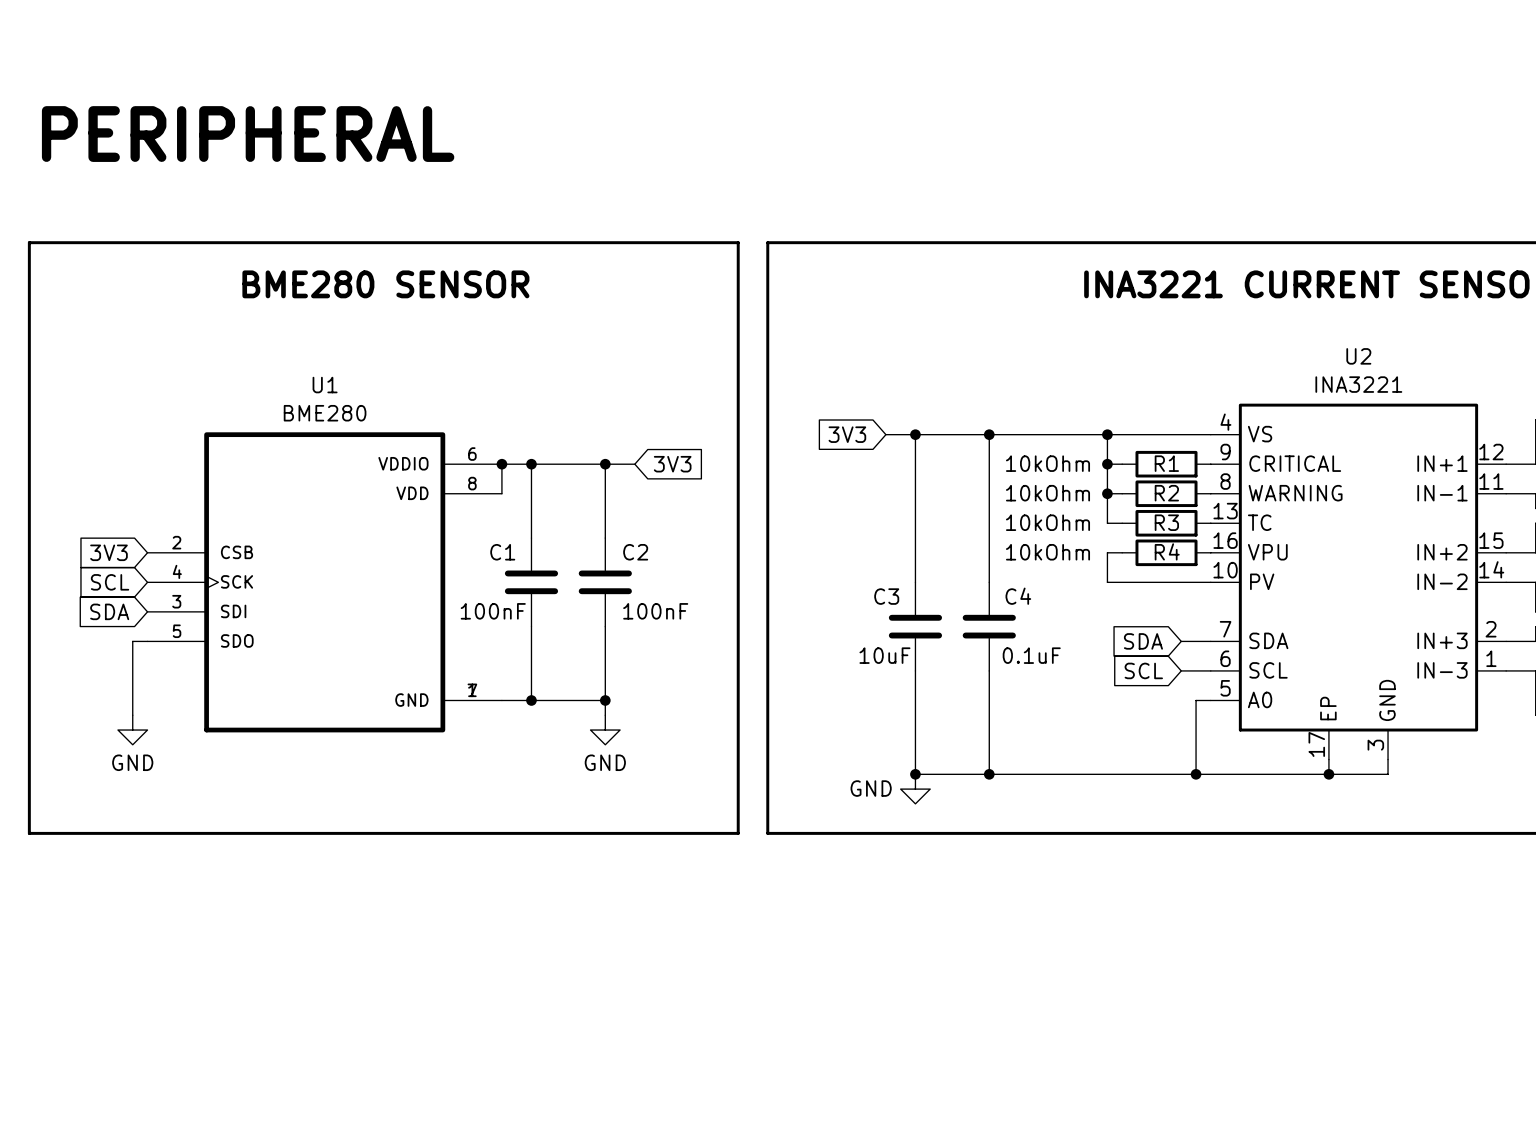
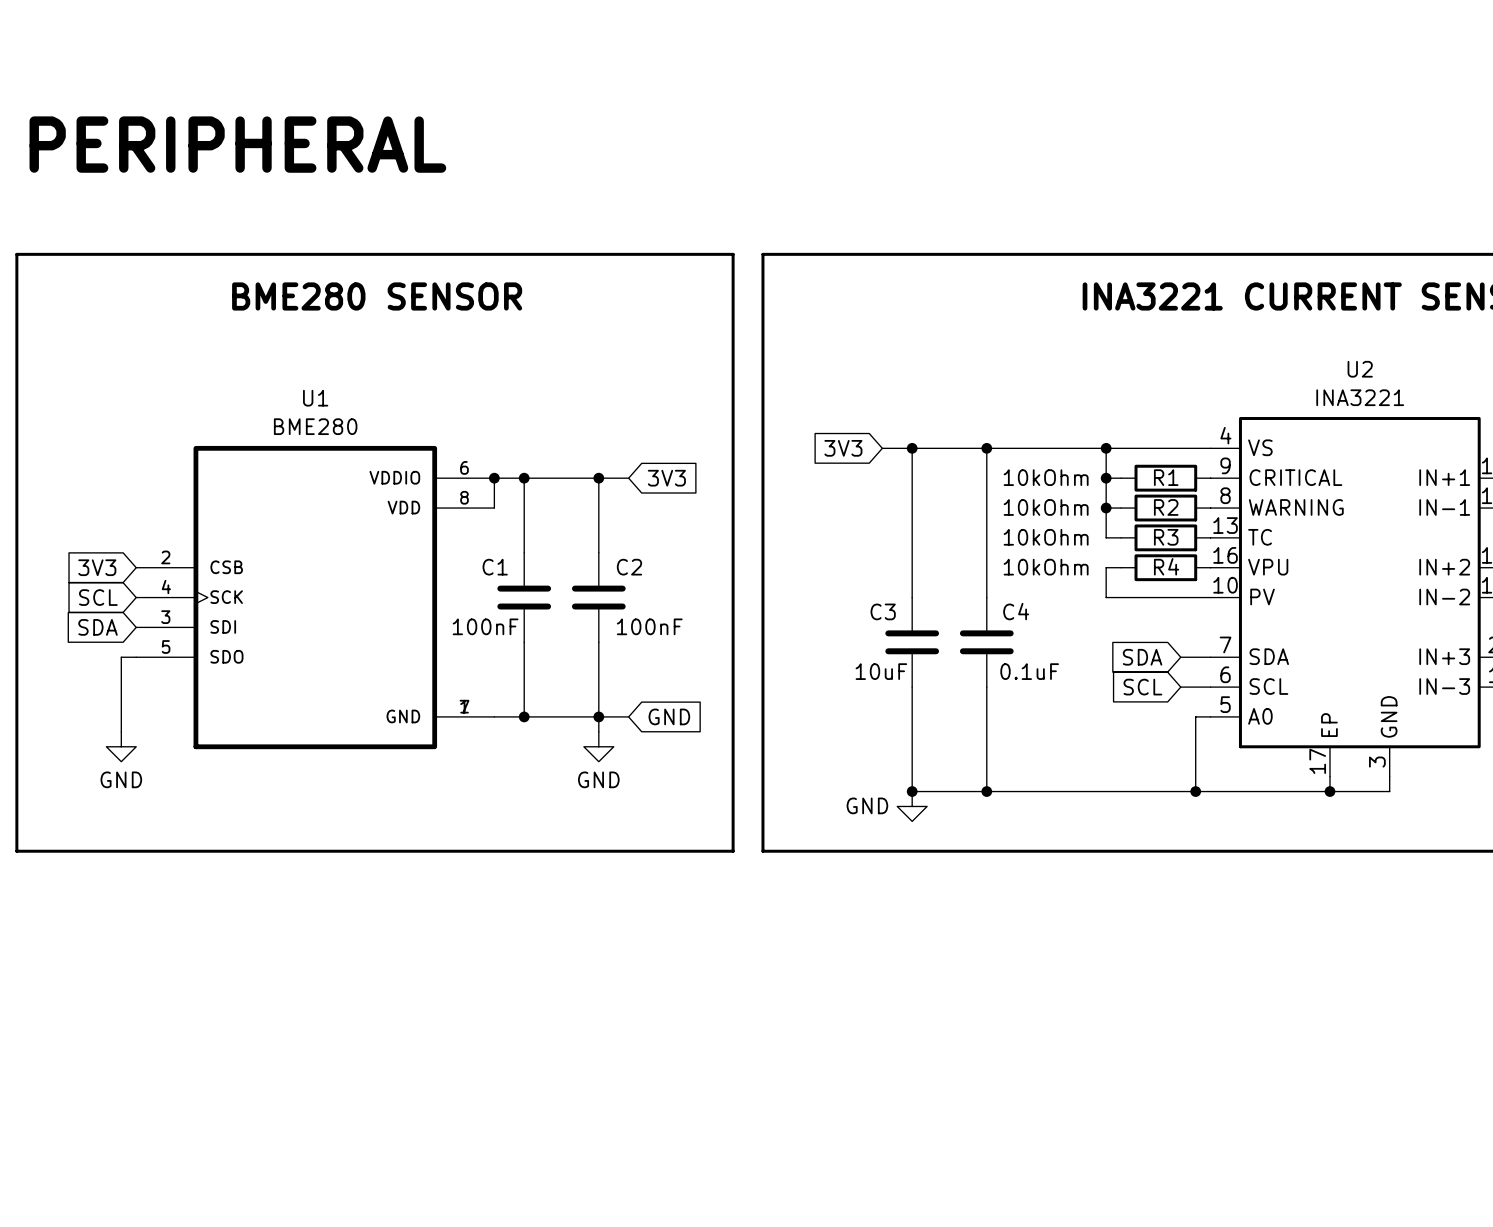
wire: none -> (598, 716) (628, 716)
global label: none -> GND (669, 716)

